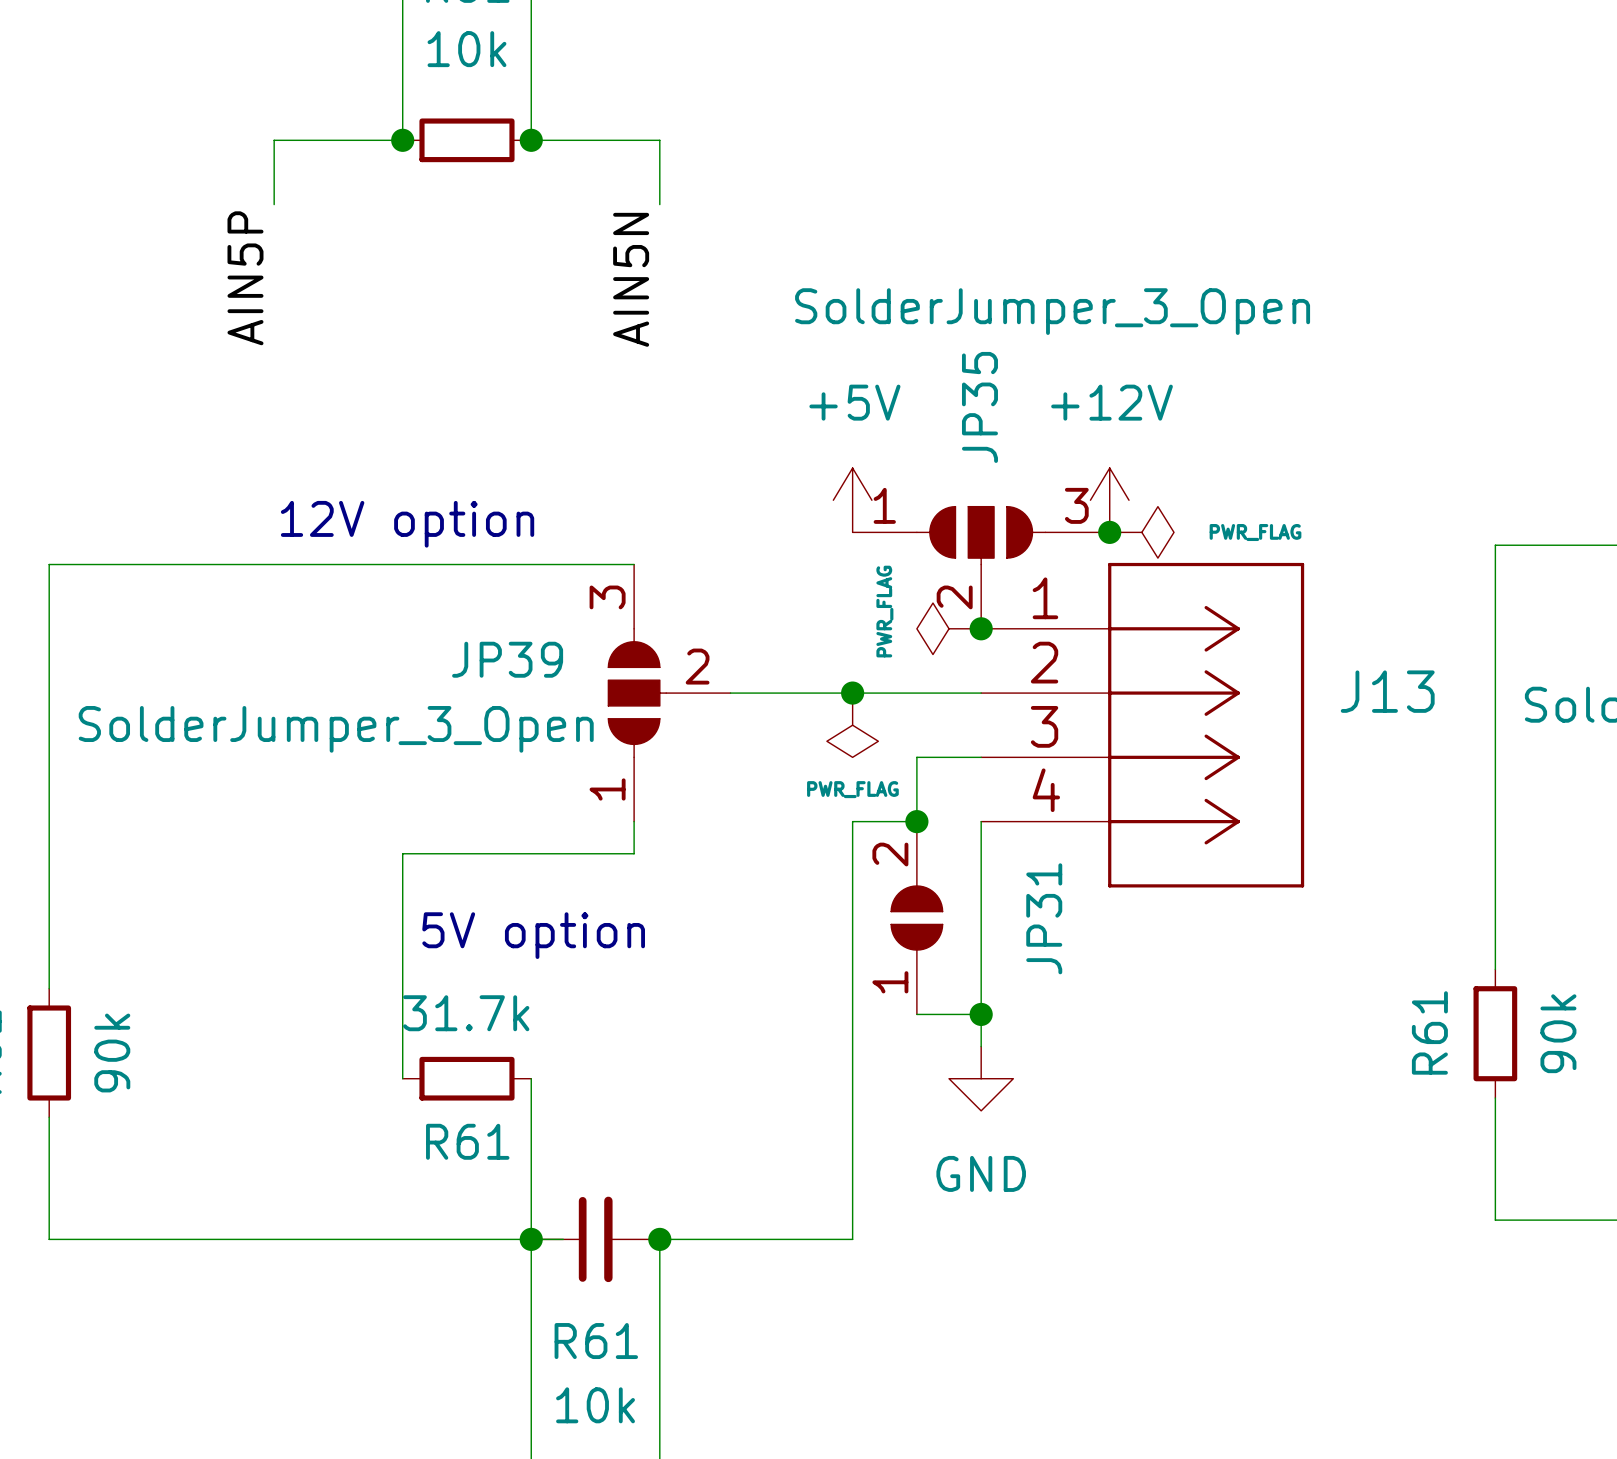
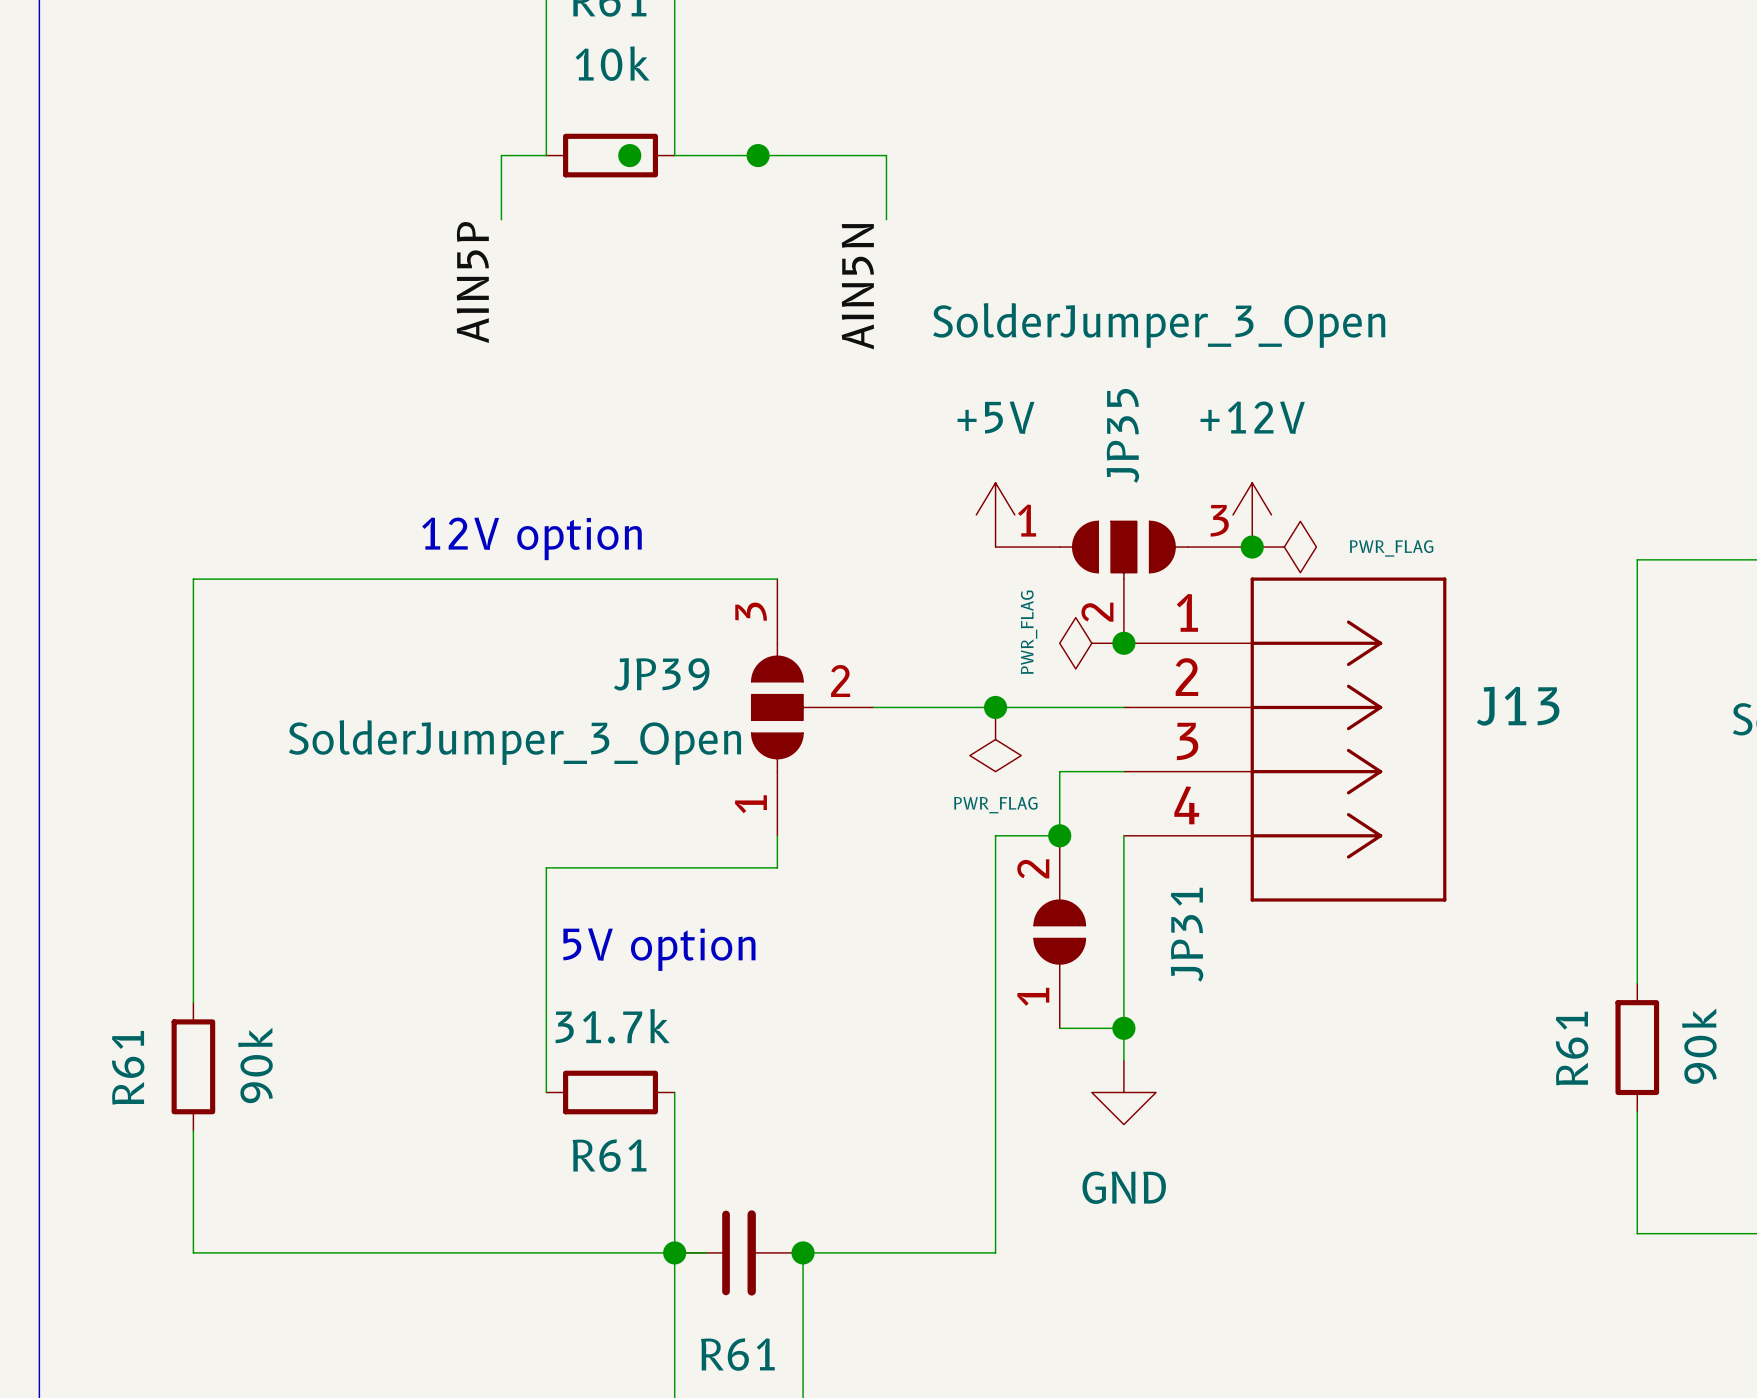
wire: (357, 140) (274, 140) (274, 204) -> (501, 155) (501, 219)
junction: (402, 140) -> none
junction: none -> (629, 155)
junction: (531, 140) -> none
junction: none -> (758, 155)
wire: (659, 140) (659, 204) -> (803, 155) (886, 155) (886, 219)
label position: AIN5P (245, 278) -> AIN5P (472, 282)
label position: AIN5N (631, 279) -> AIN5N (857, 286)

